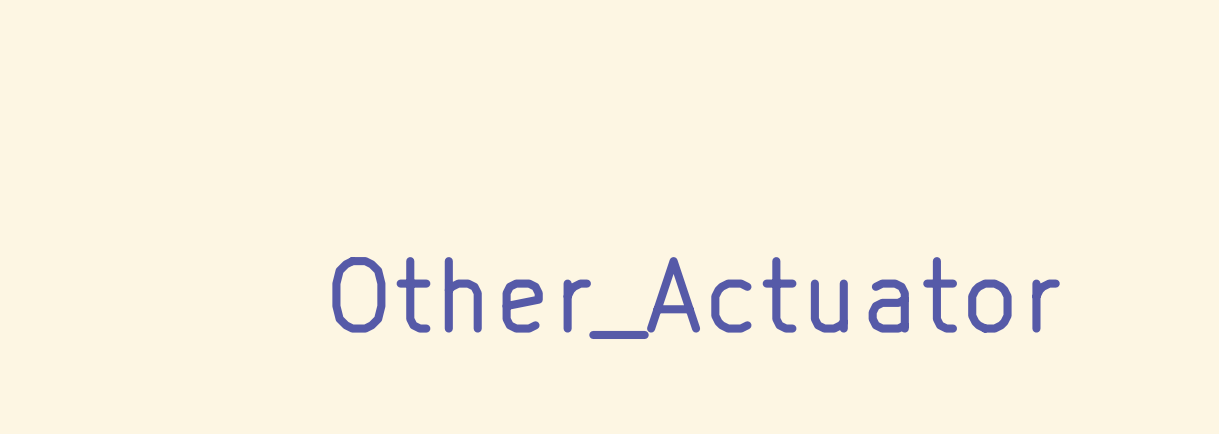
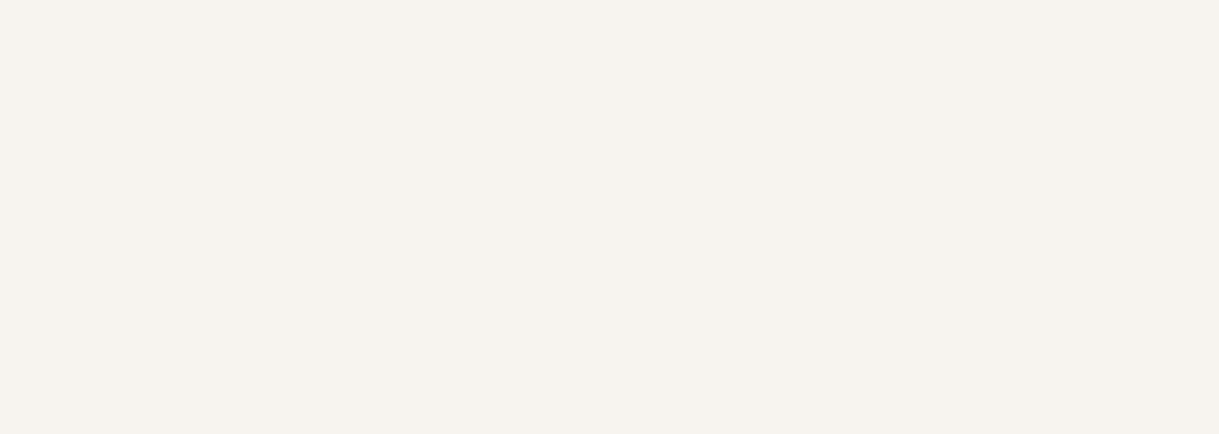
text: Other_Actuator (696, 298) -> none

